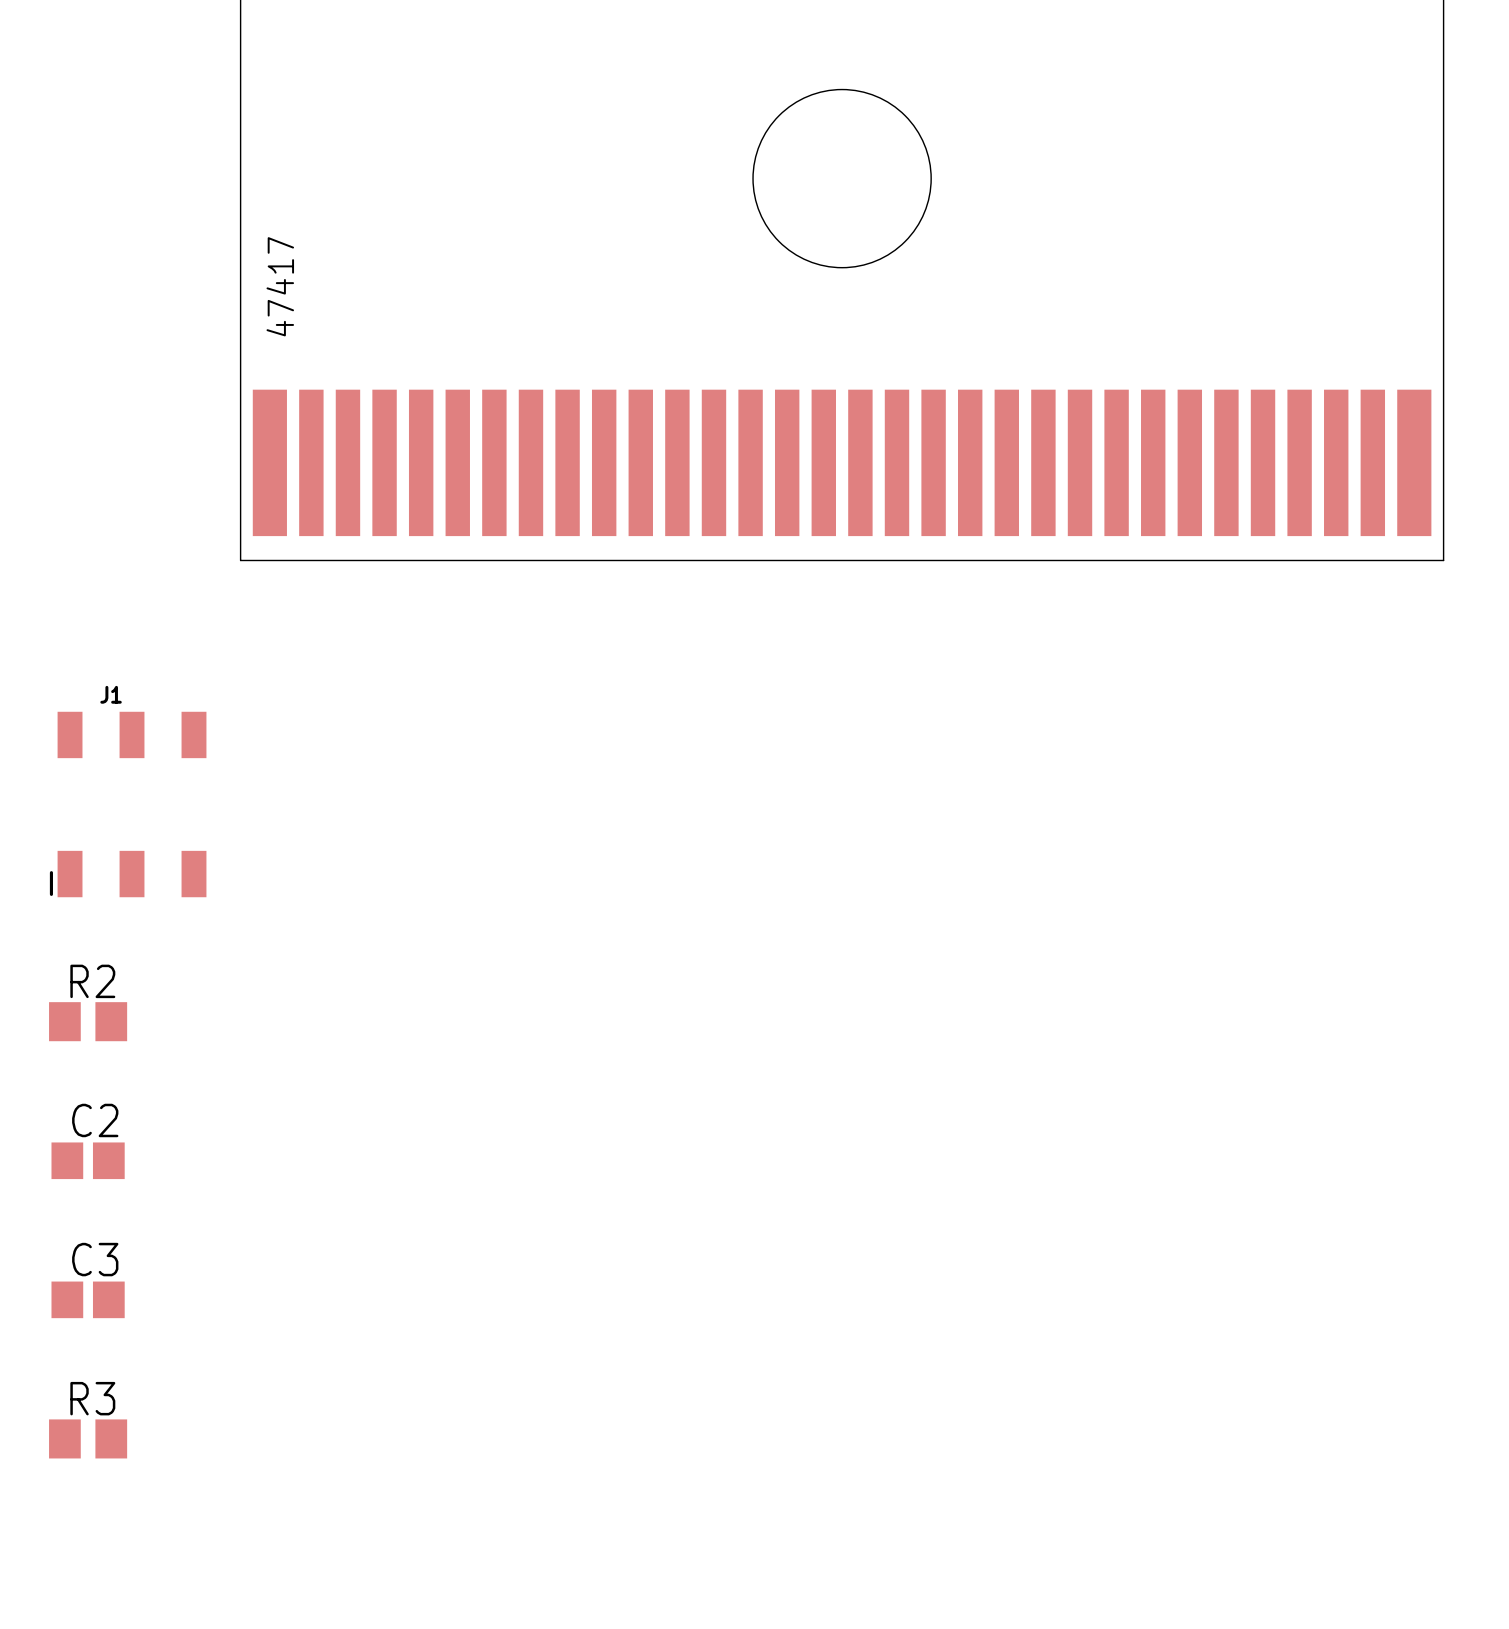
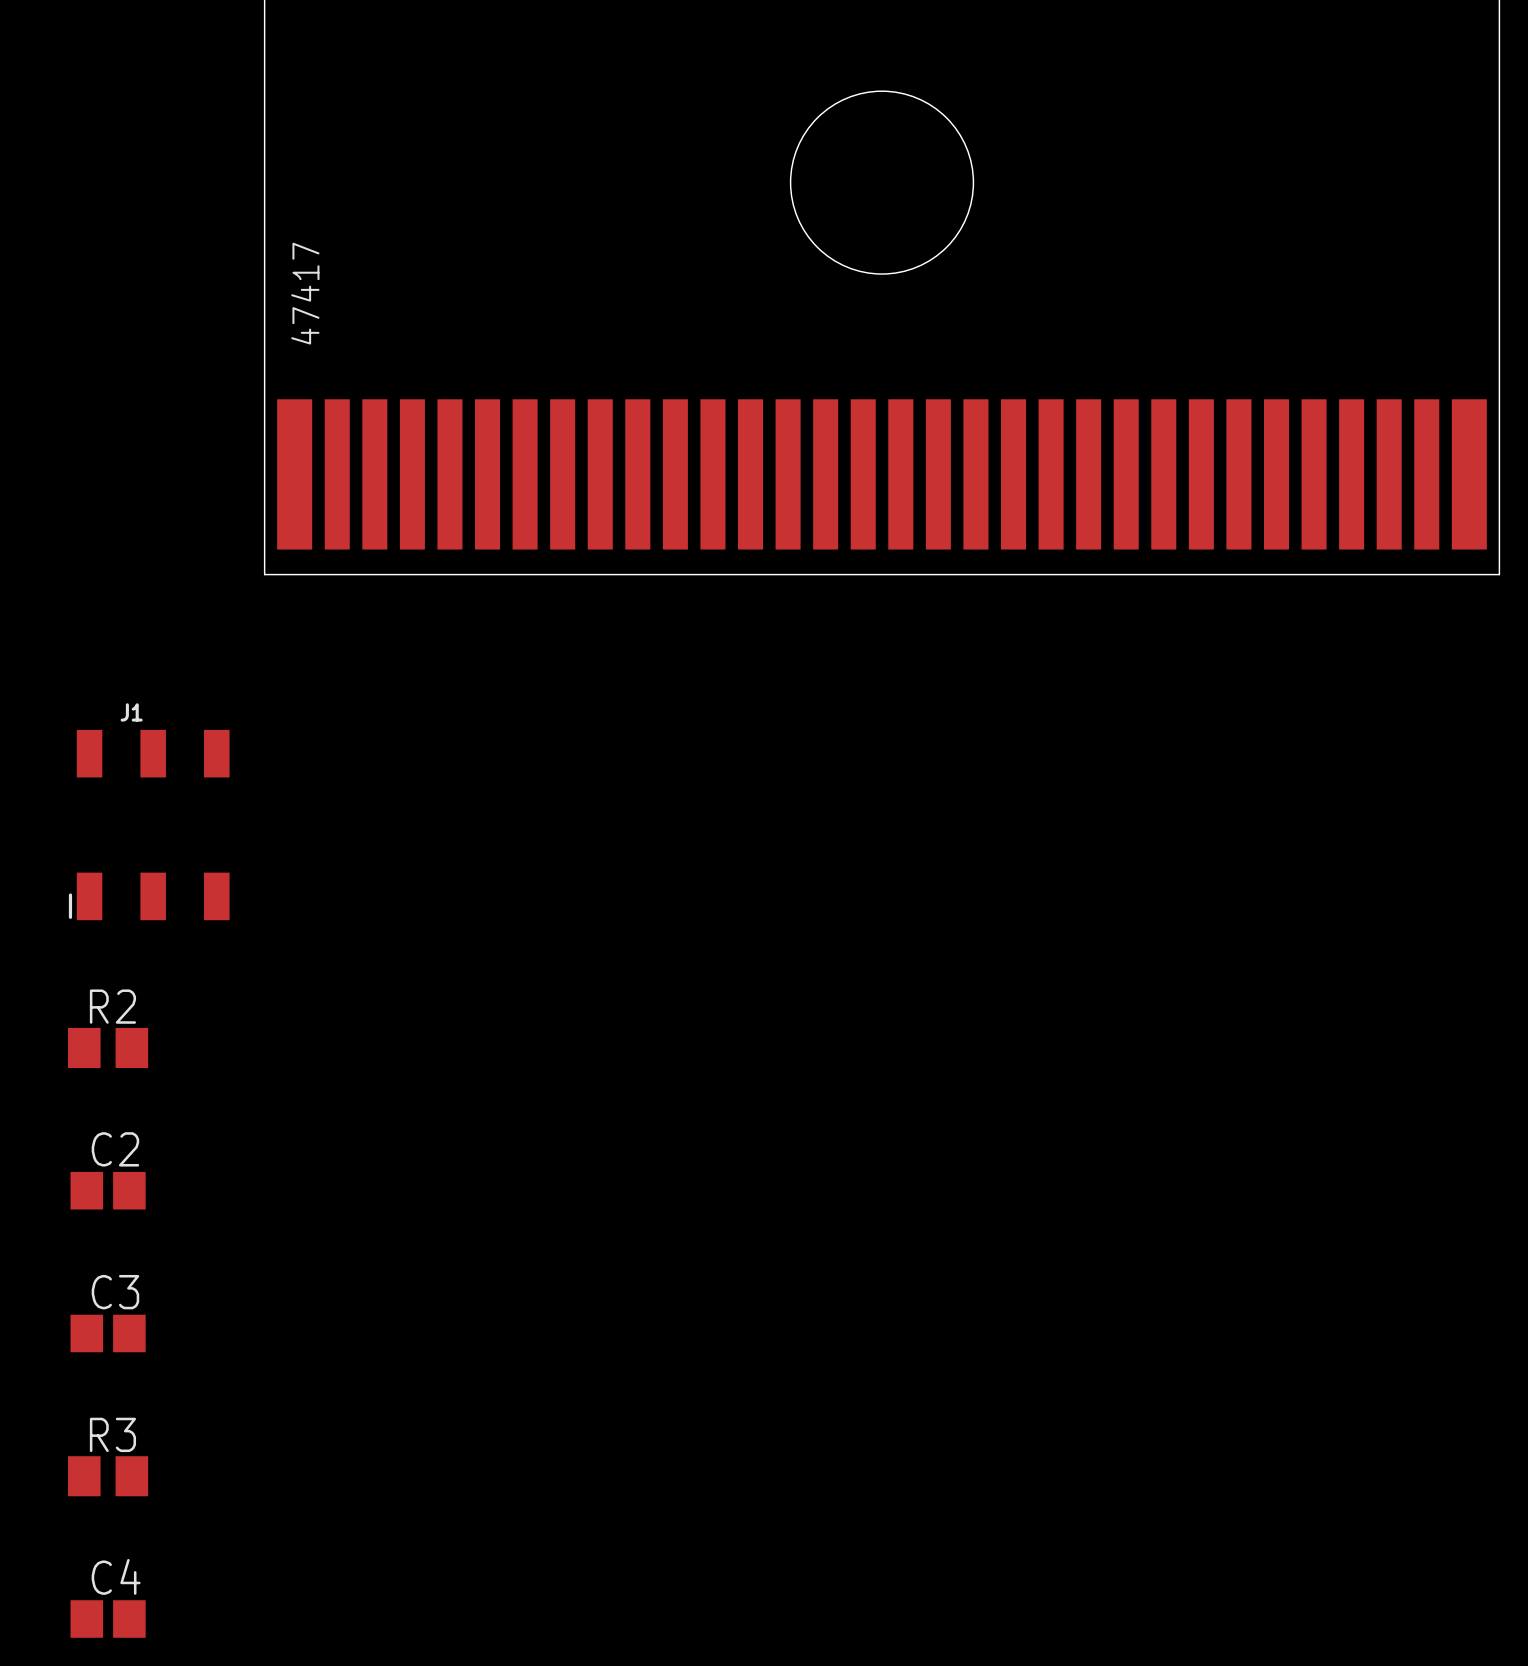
C4: none -> (108, 1619)

